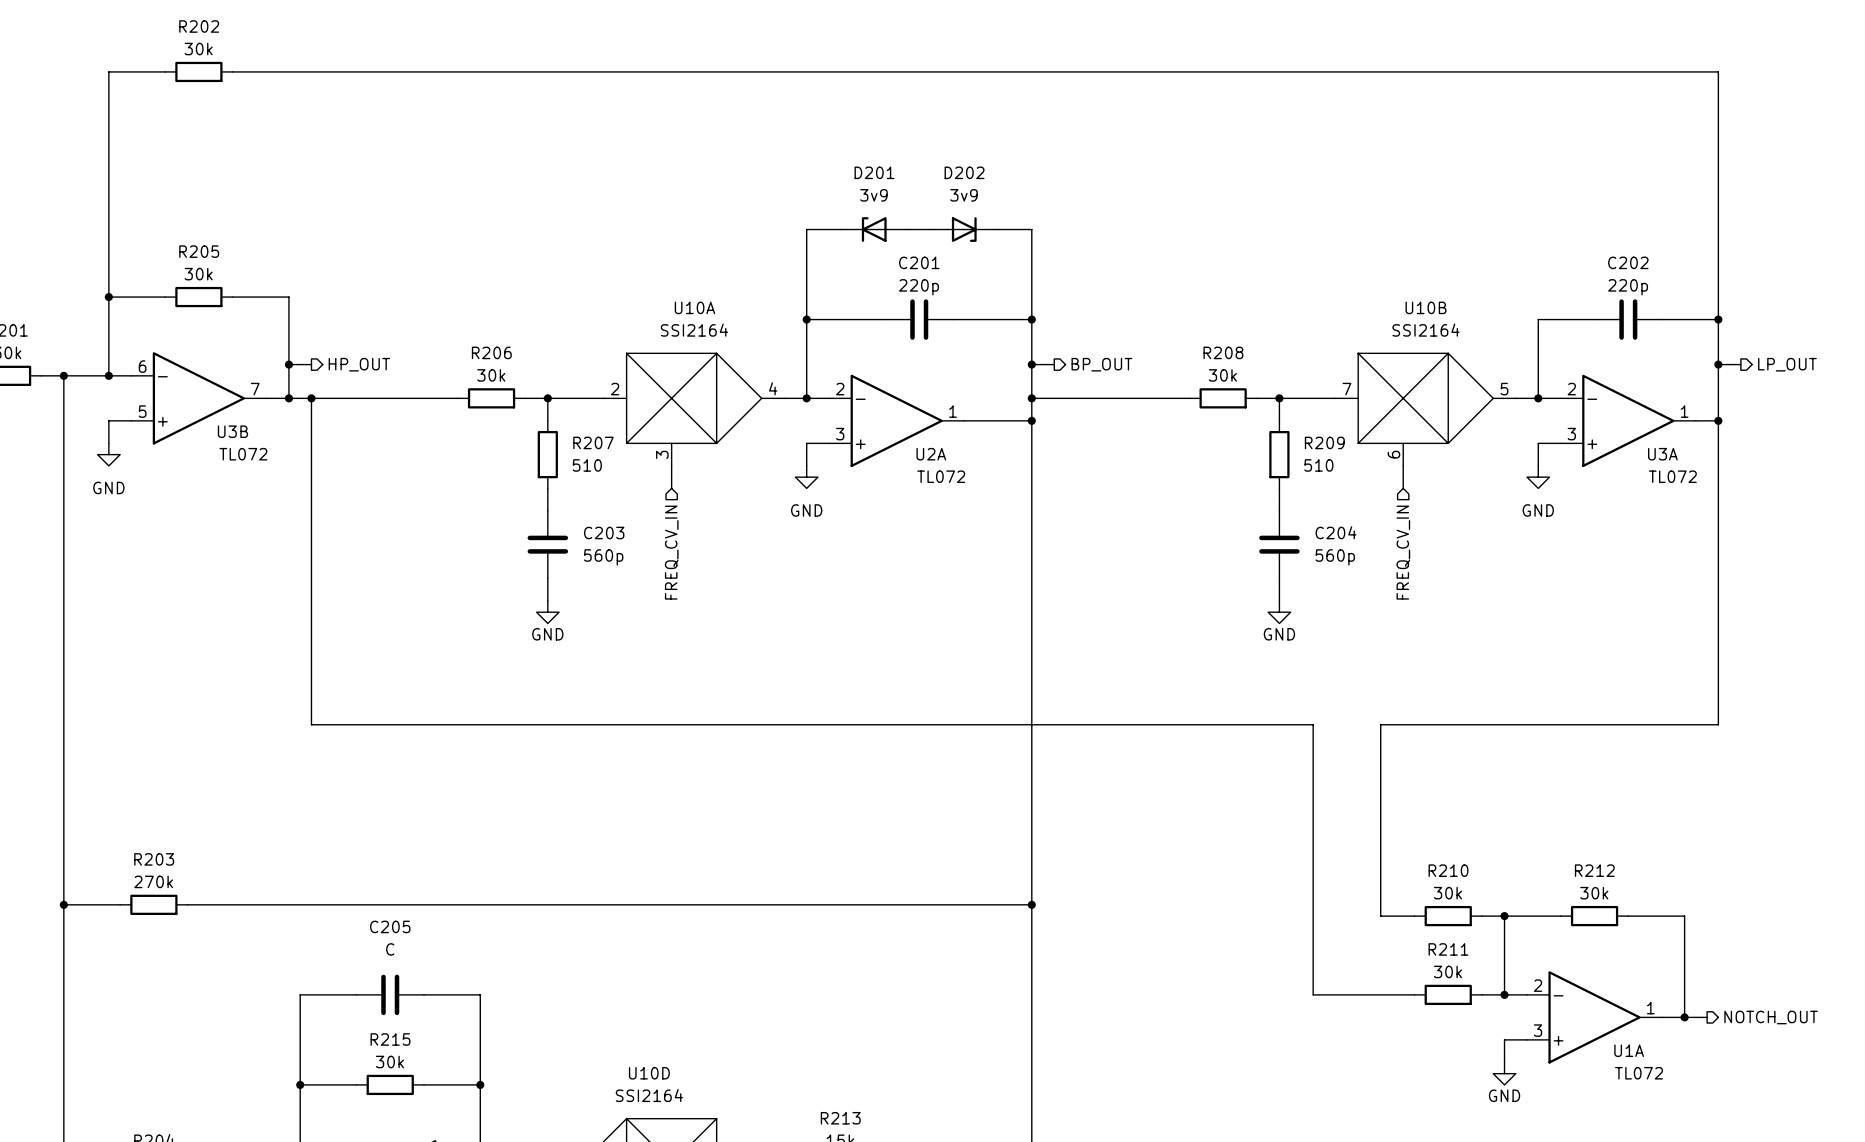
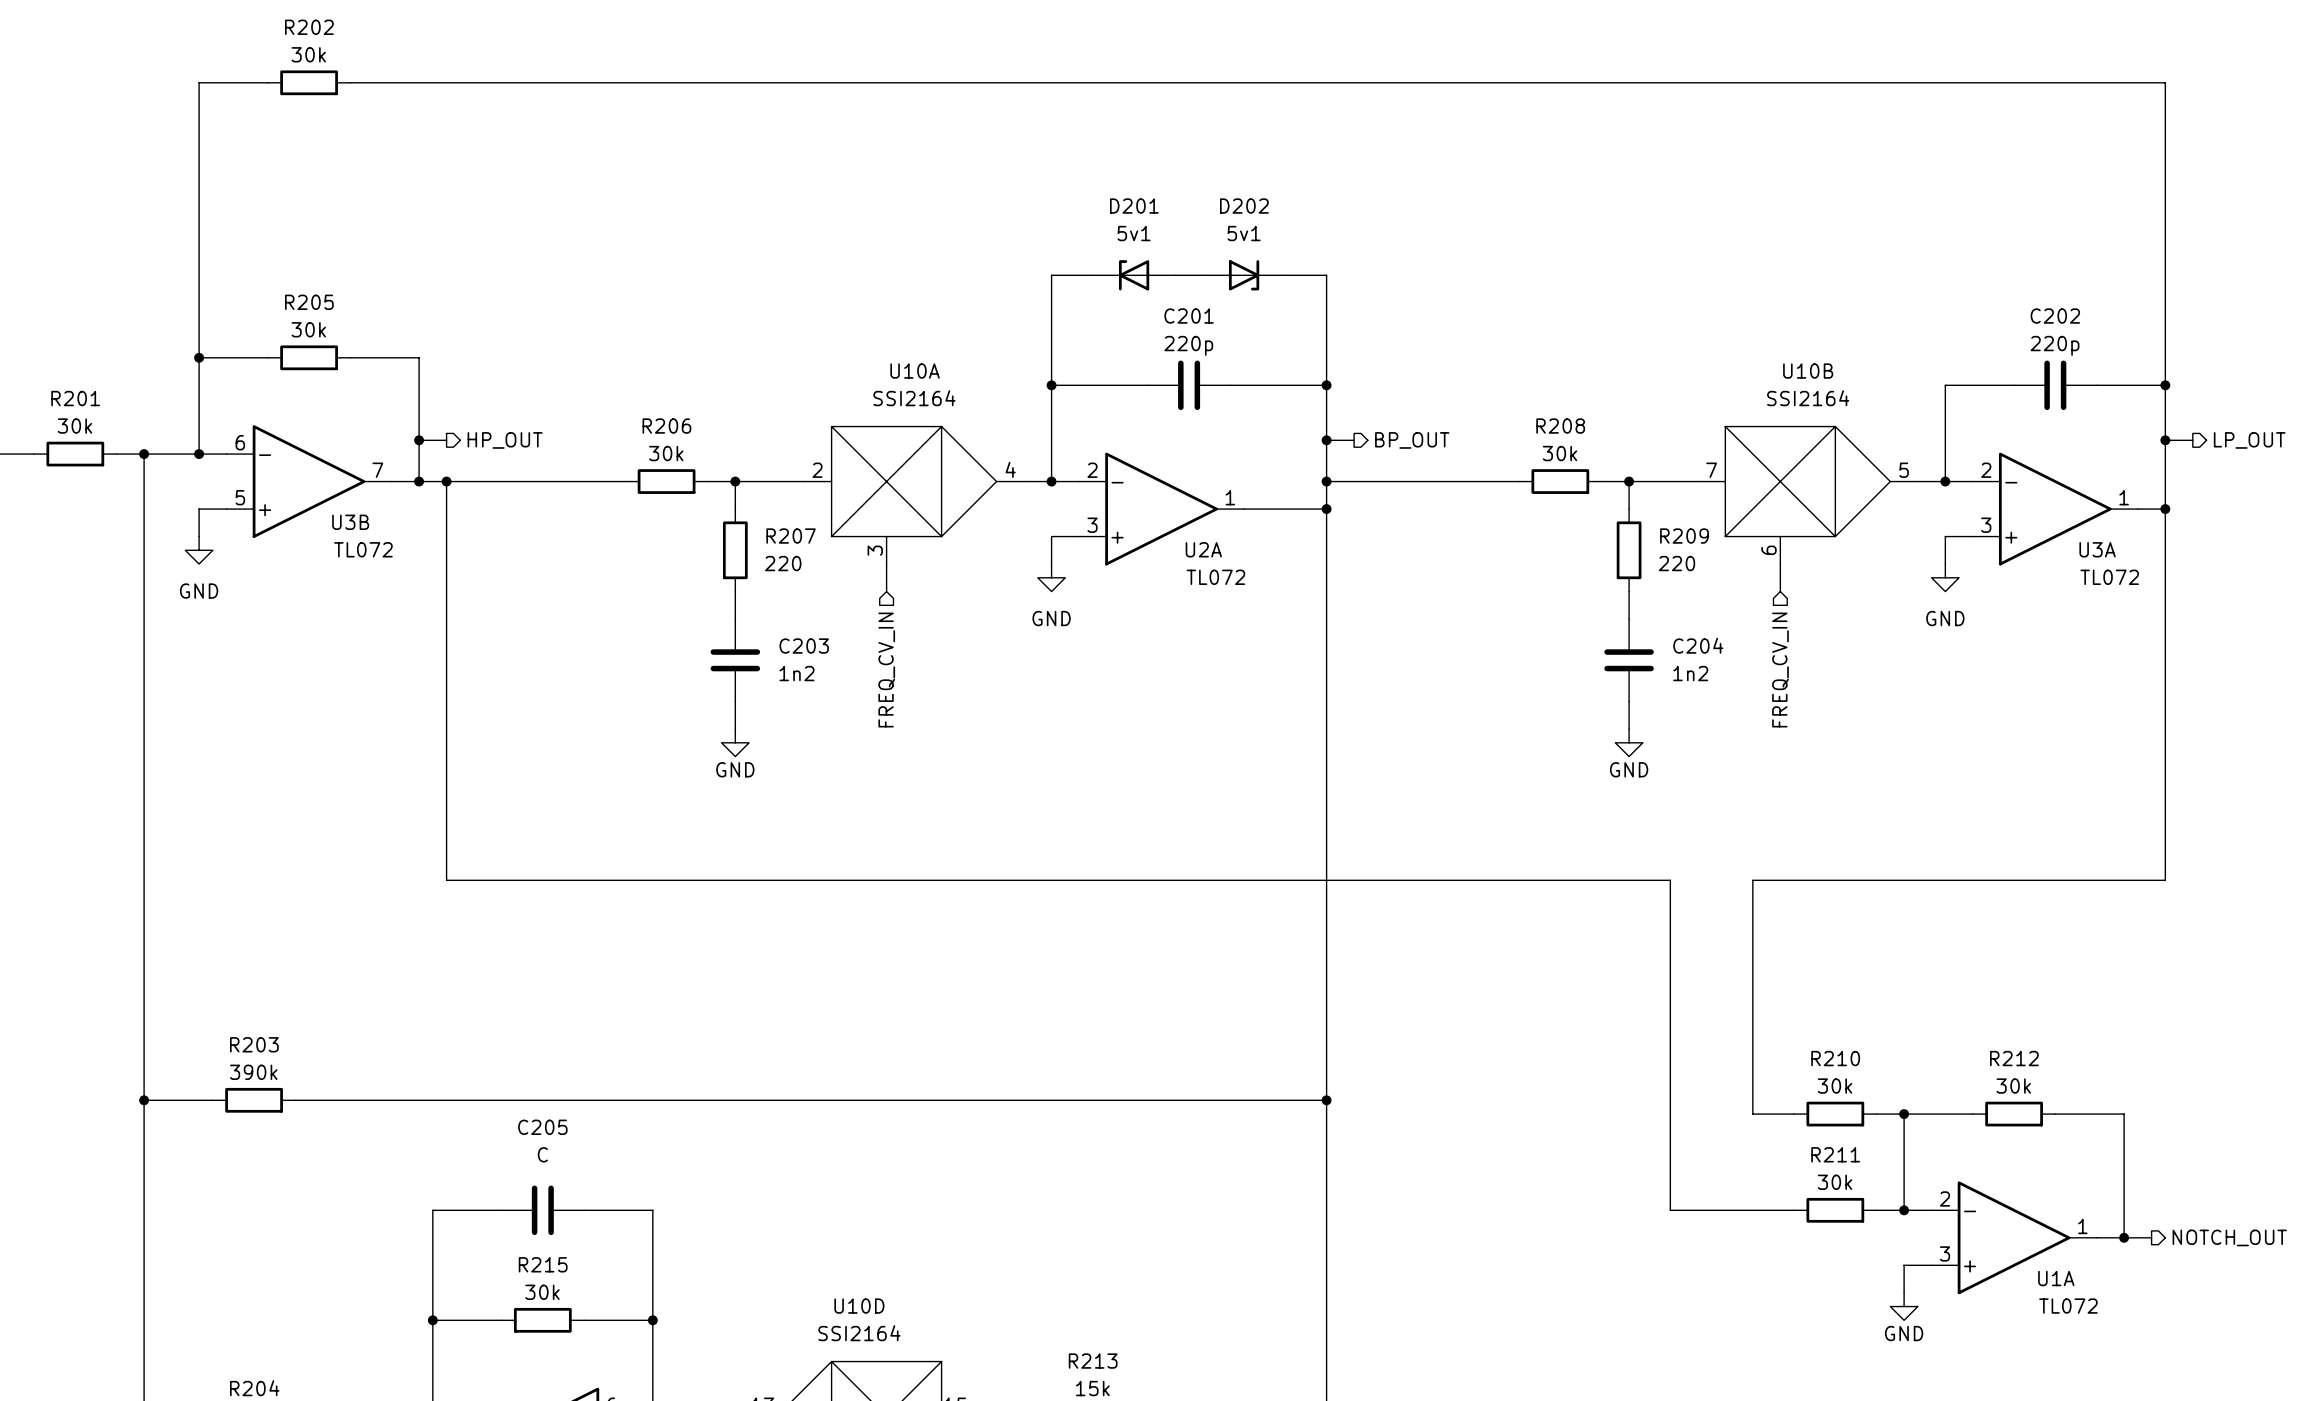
D201 value: 3v9 (873, 195) -> 5v1 (1134, 233)
D202 value: 3v9 (964, 195) -> 5v1 (1244, 233)
R207 value: 510 (587, 465) -> 220 (783, 563)
R209 value: 510 (1318, 465) -> 220 (1676, 563)
C203 value: 560p (603, 557) -> 1n2 (796, 673)
C204 value: 560p (1335, 557) -> 1n2 (1690, 673)
R203 value: 270k (153, 881) -> 390k (253, 1072)

